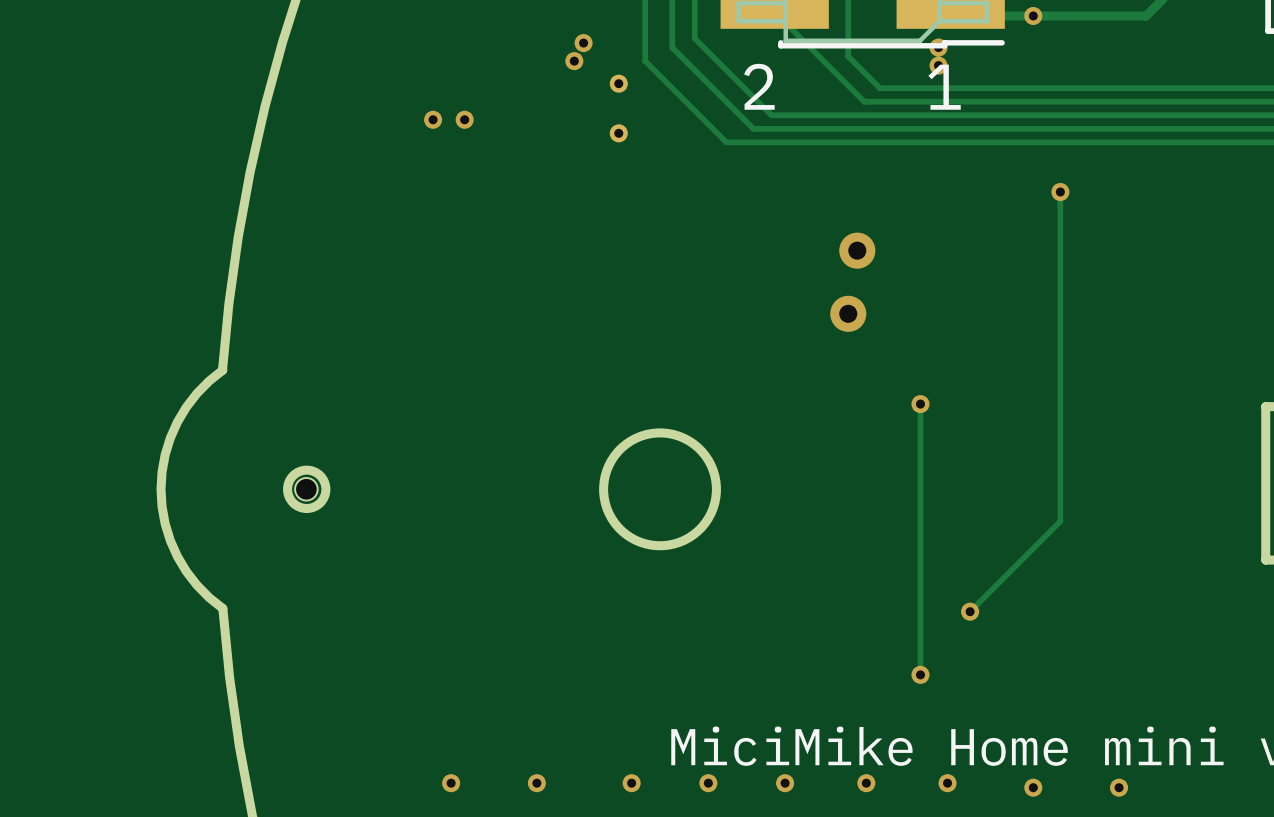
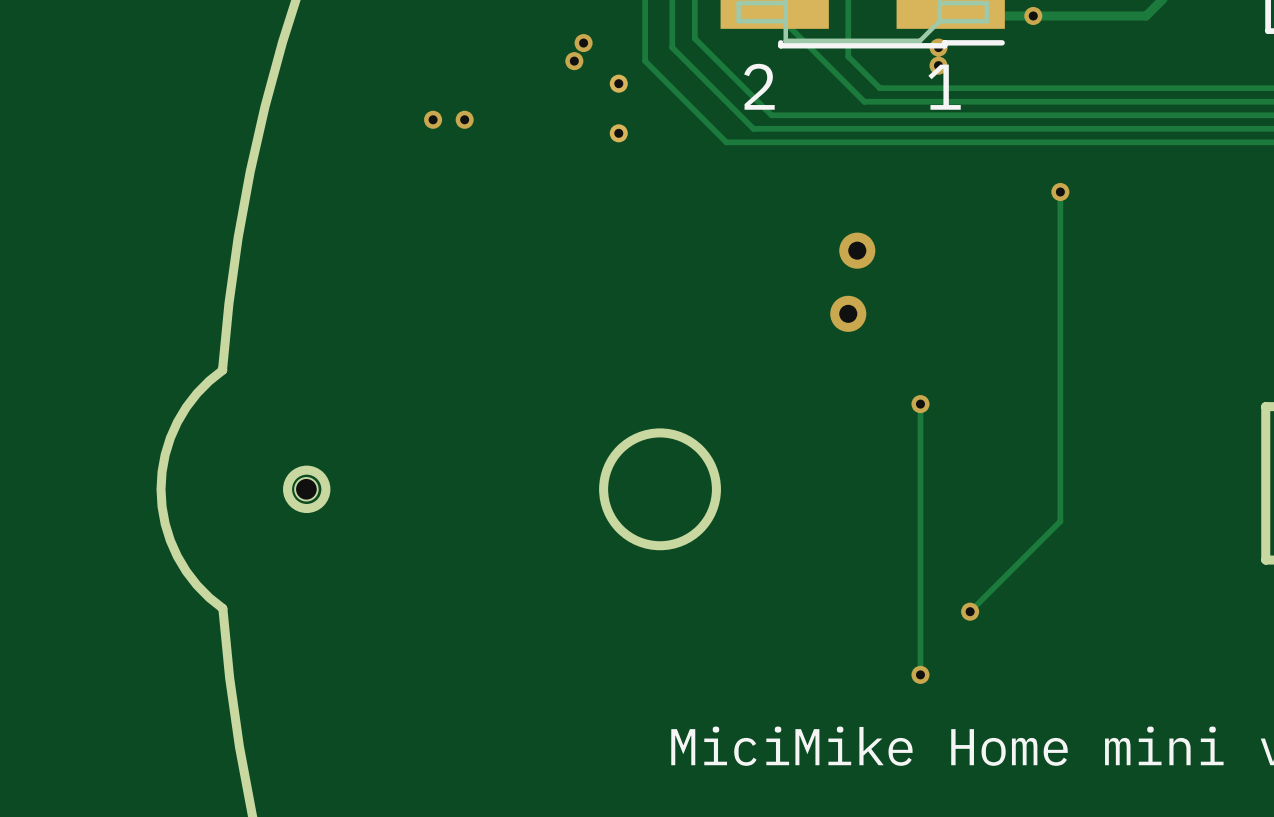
via: (451, 783) -> none
via: (536, 783) -> none
via: (631, 783) -> none
via: (708, 783) -> none
via: (785, 783) -> none
via: (866, 783) -> none
via: (947, 783) -> none
via: (1033, 787) -> none
via: (1119, 787) -> none

